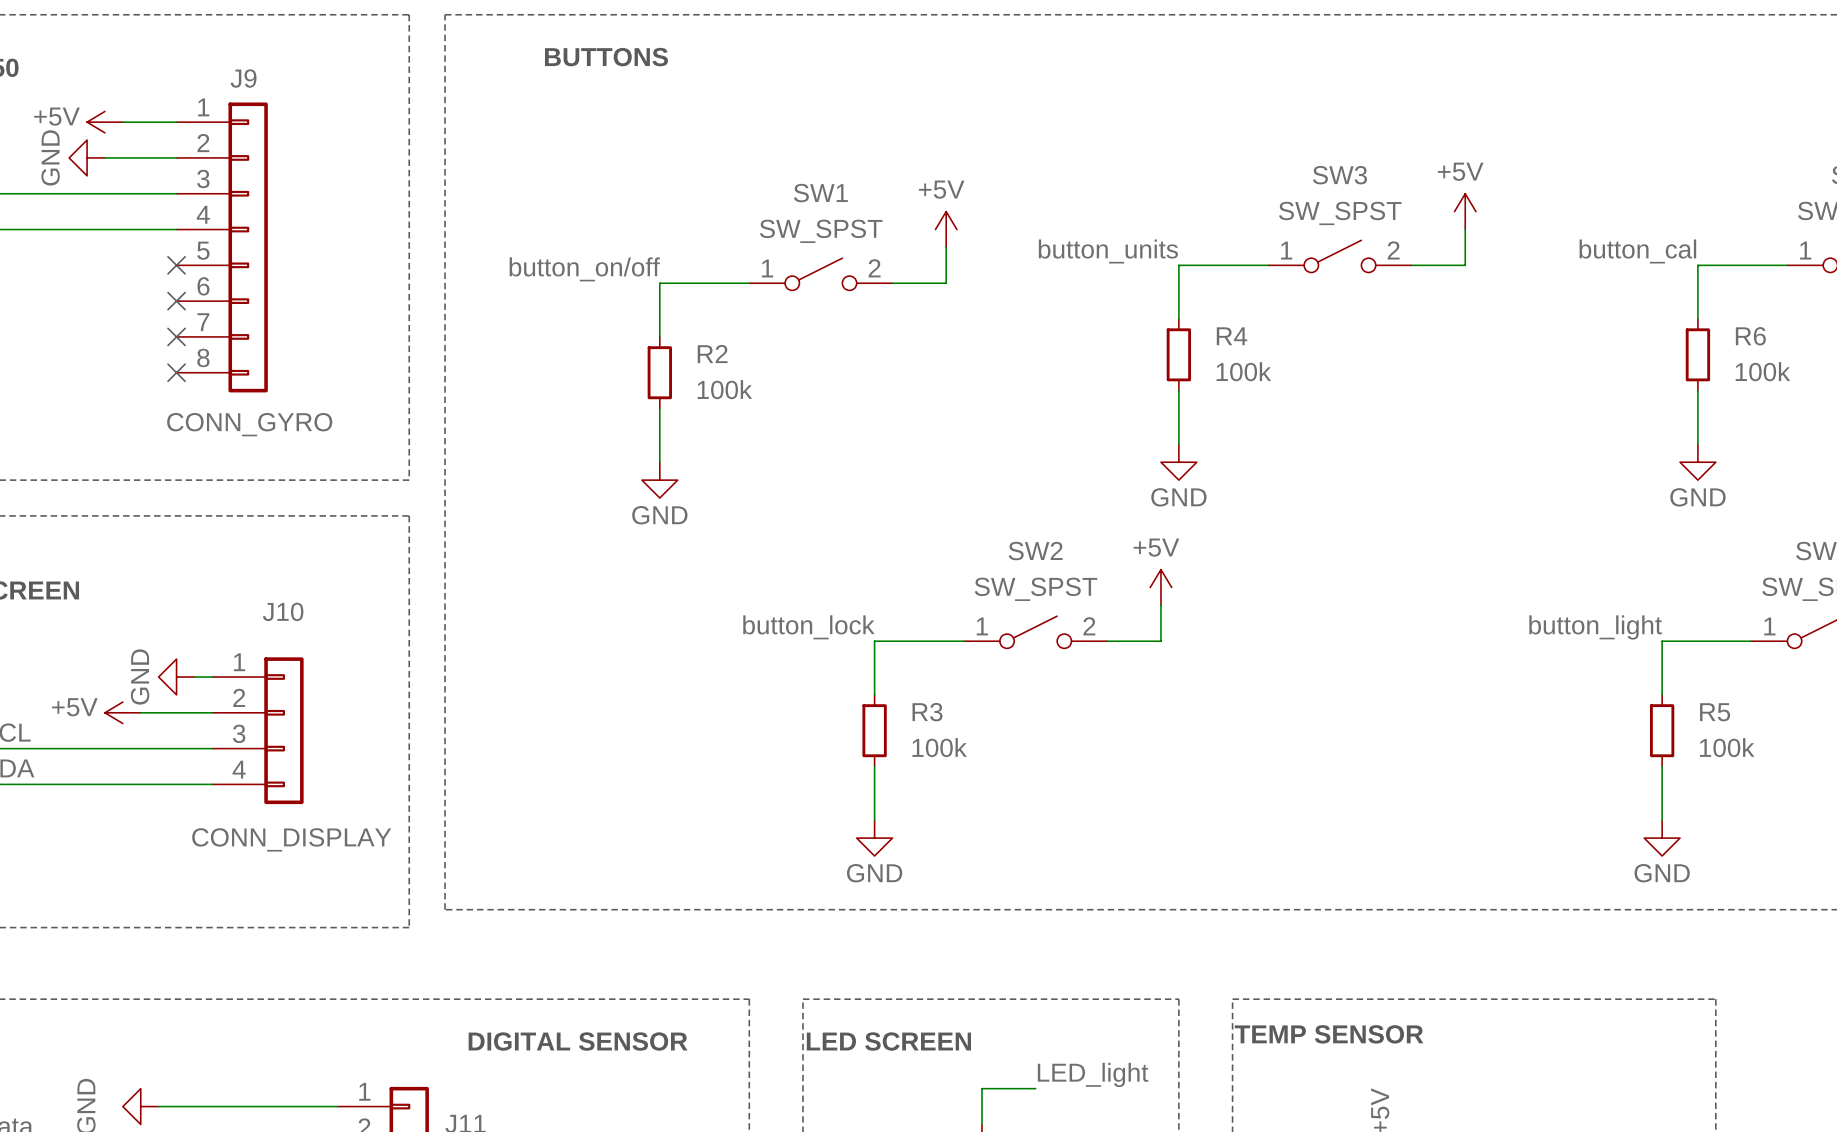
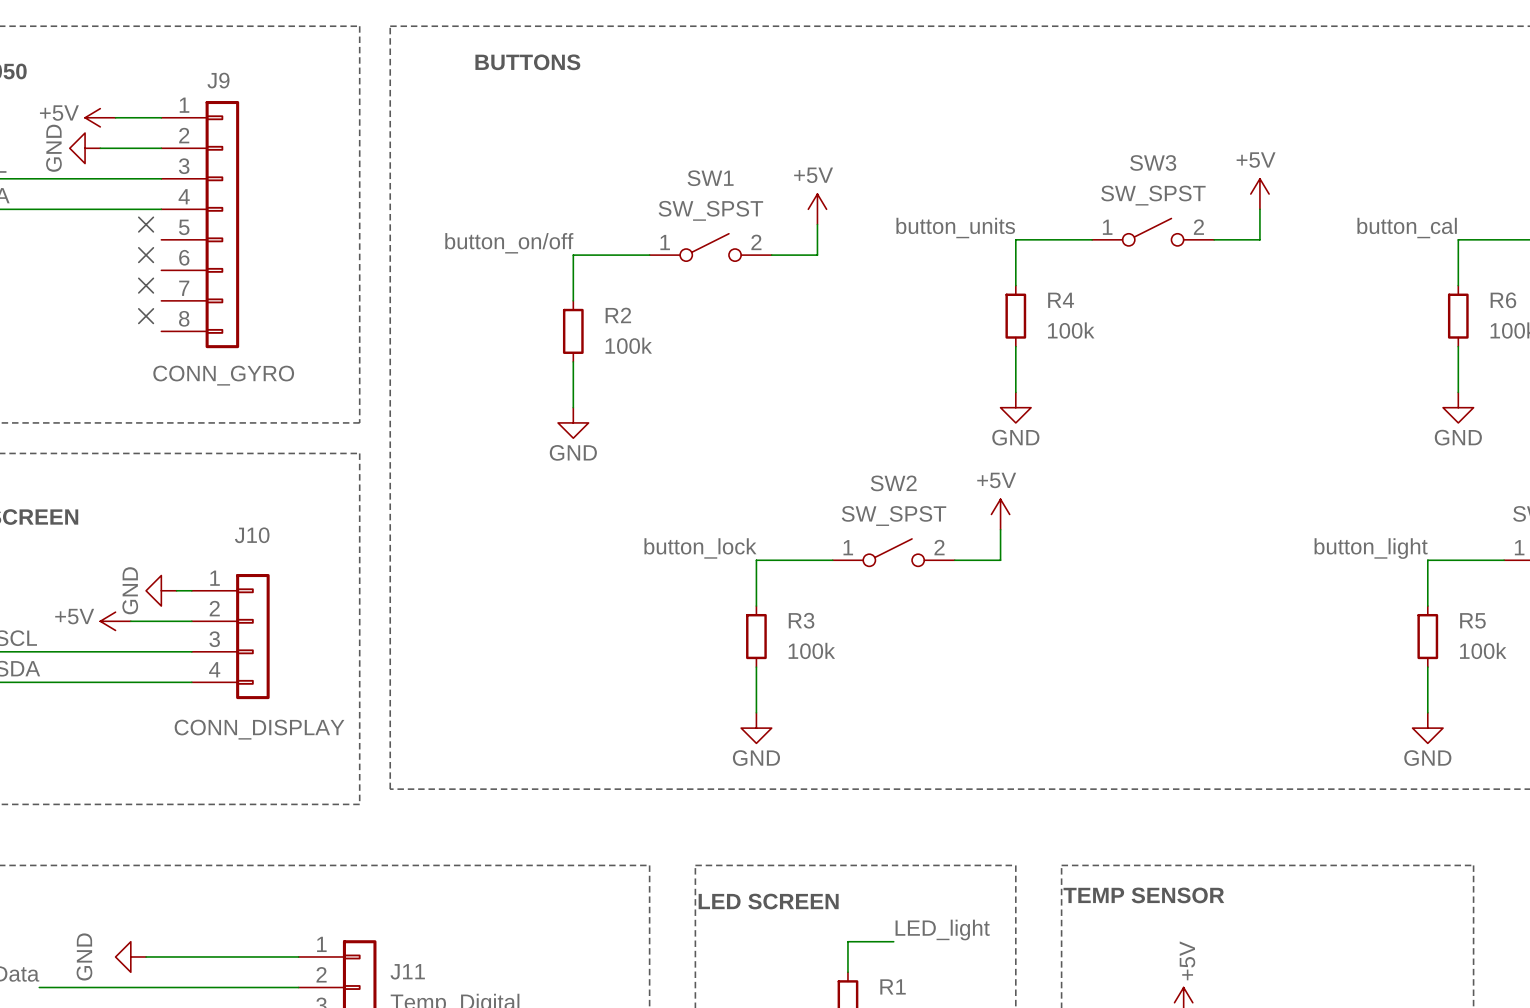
no-connect mark: none -> (146, 224)
no-connect mark: (176, 265) -> none
no-connect mark: none -> (146, 255)
no-connect mark: (176, 301) -> none
no-connect mark: none -> (146, 285)
no-connect mark: (176, 336) -> none
no-connect mark: none -> (146, 316)
no-connect mark: (176, 372) -> none
text: DIGITAL SENSOR (578, 1041) -> none

